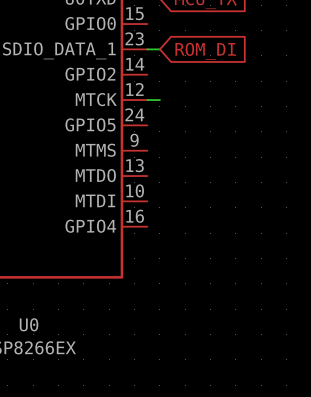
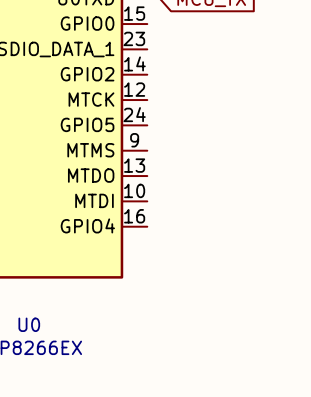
wire: (147, 49) (159, 49) -> none
global label: ROM_DI (205, 51) -> none
wire: (147, 100) (159, 100) -> none

